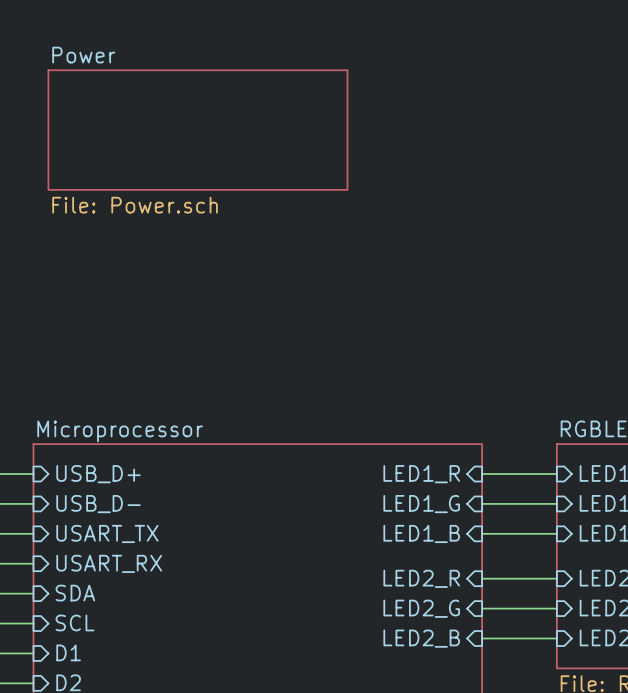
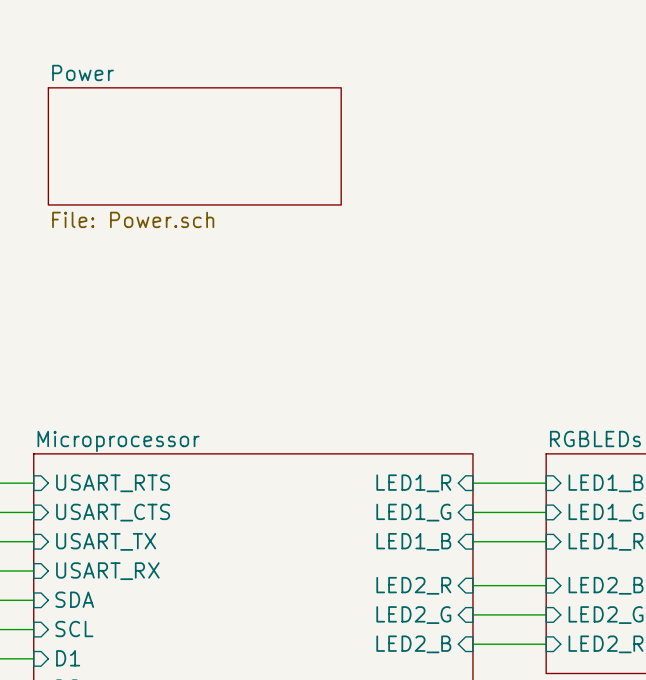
sheet pin: USB_D+ (98, 474) -> USART_RTS (113, 483)
sheet pin: USB_D- (98, 504) -> USART_CTS (113, 512)

